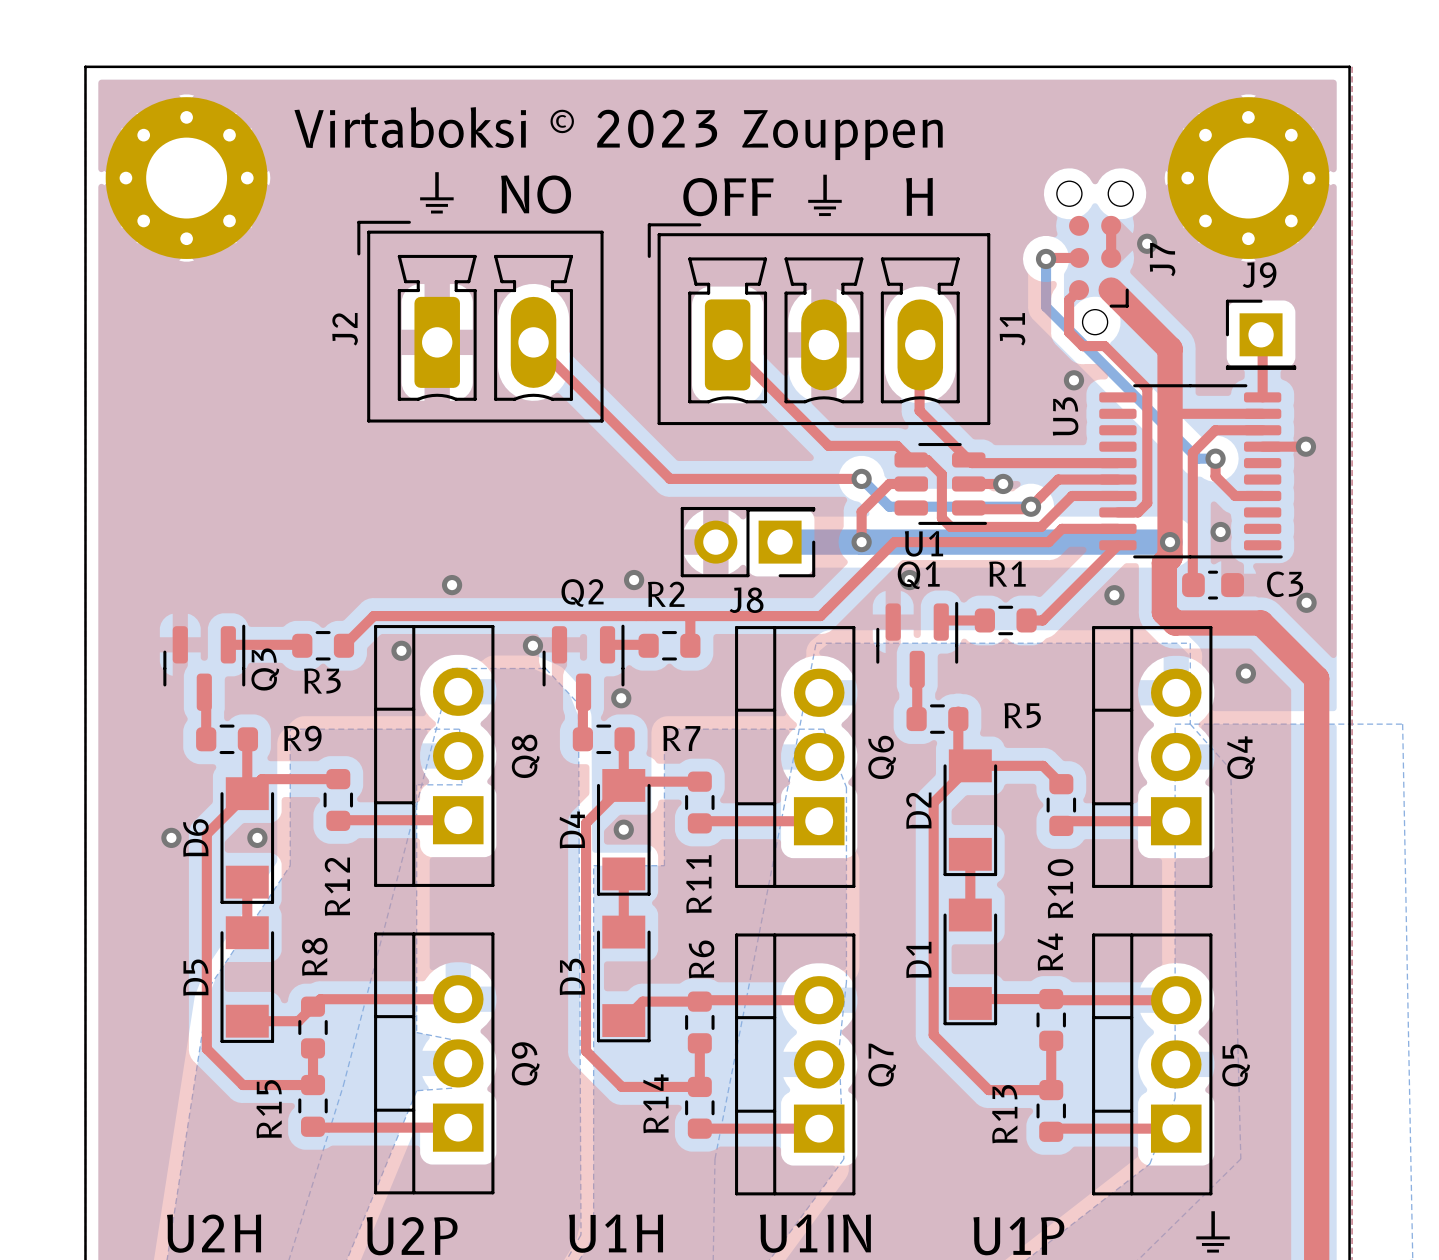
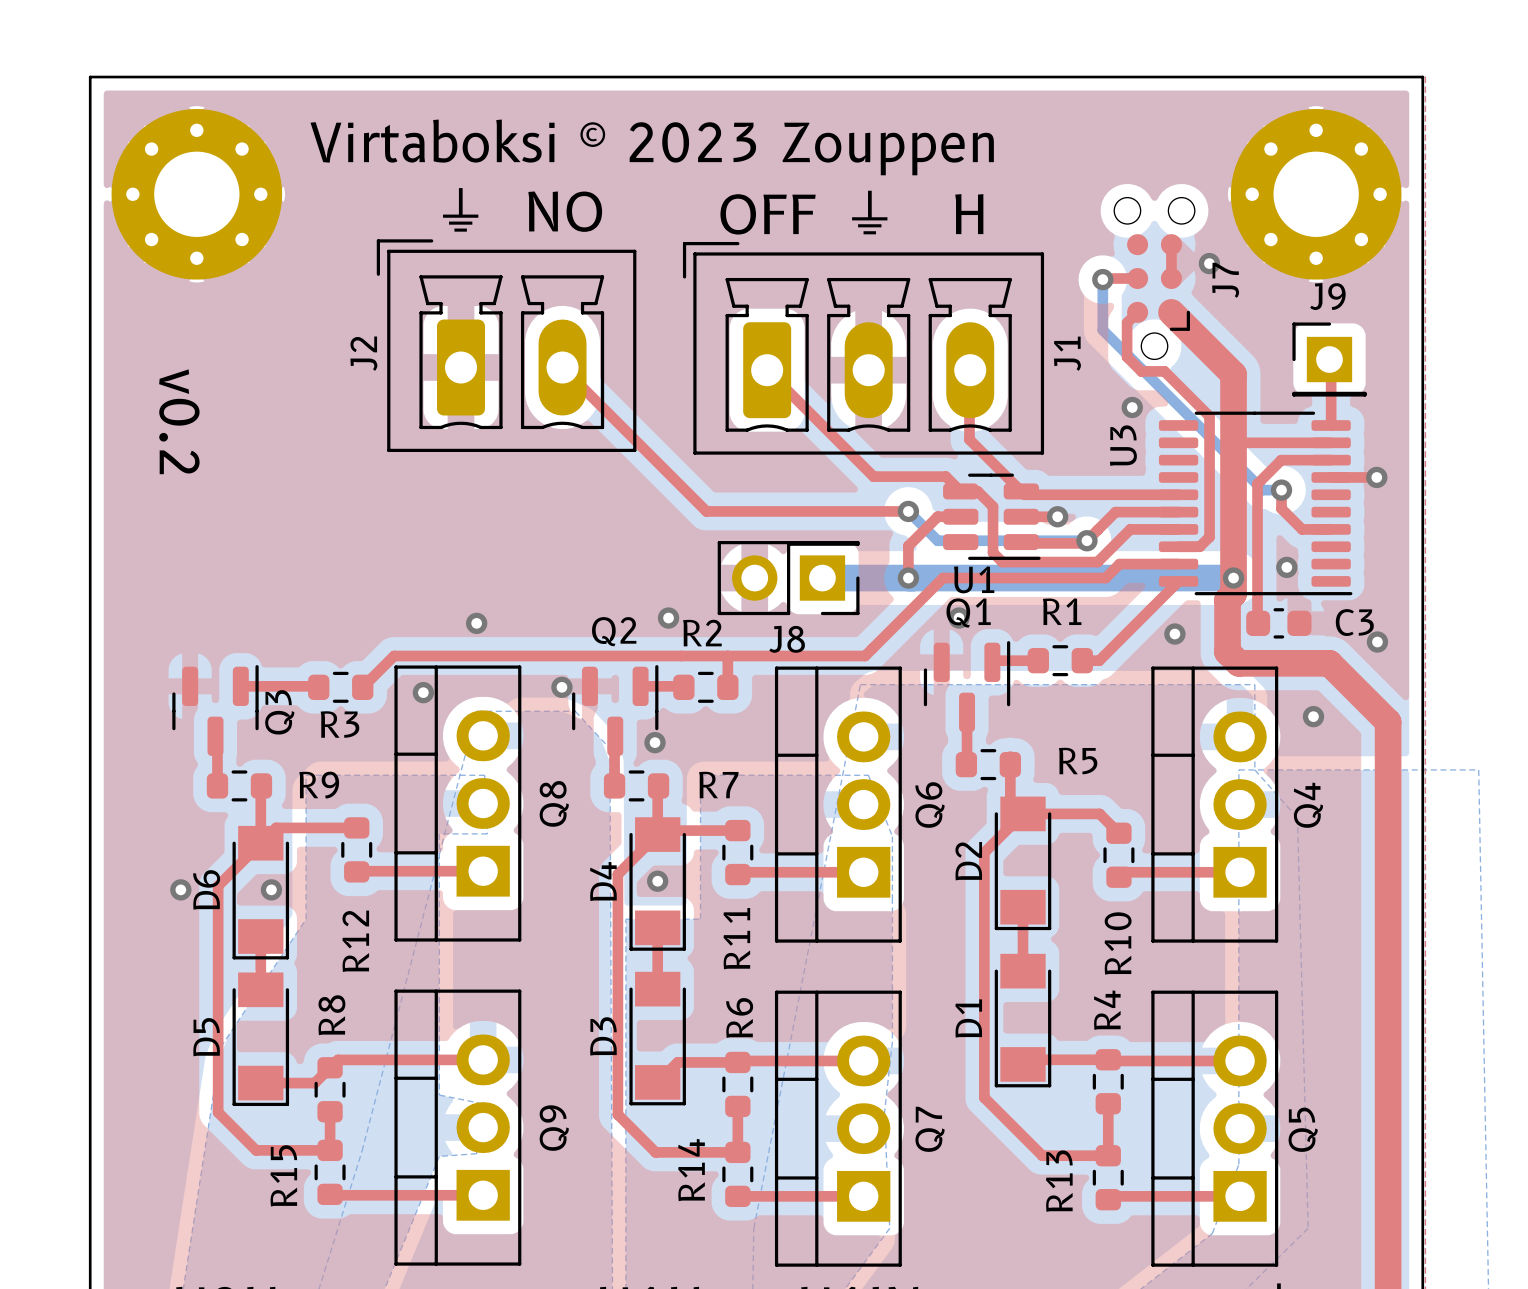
text: none -> v0.2 (179, 421)

